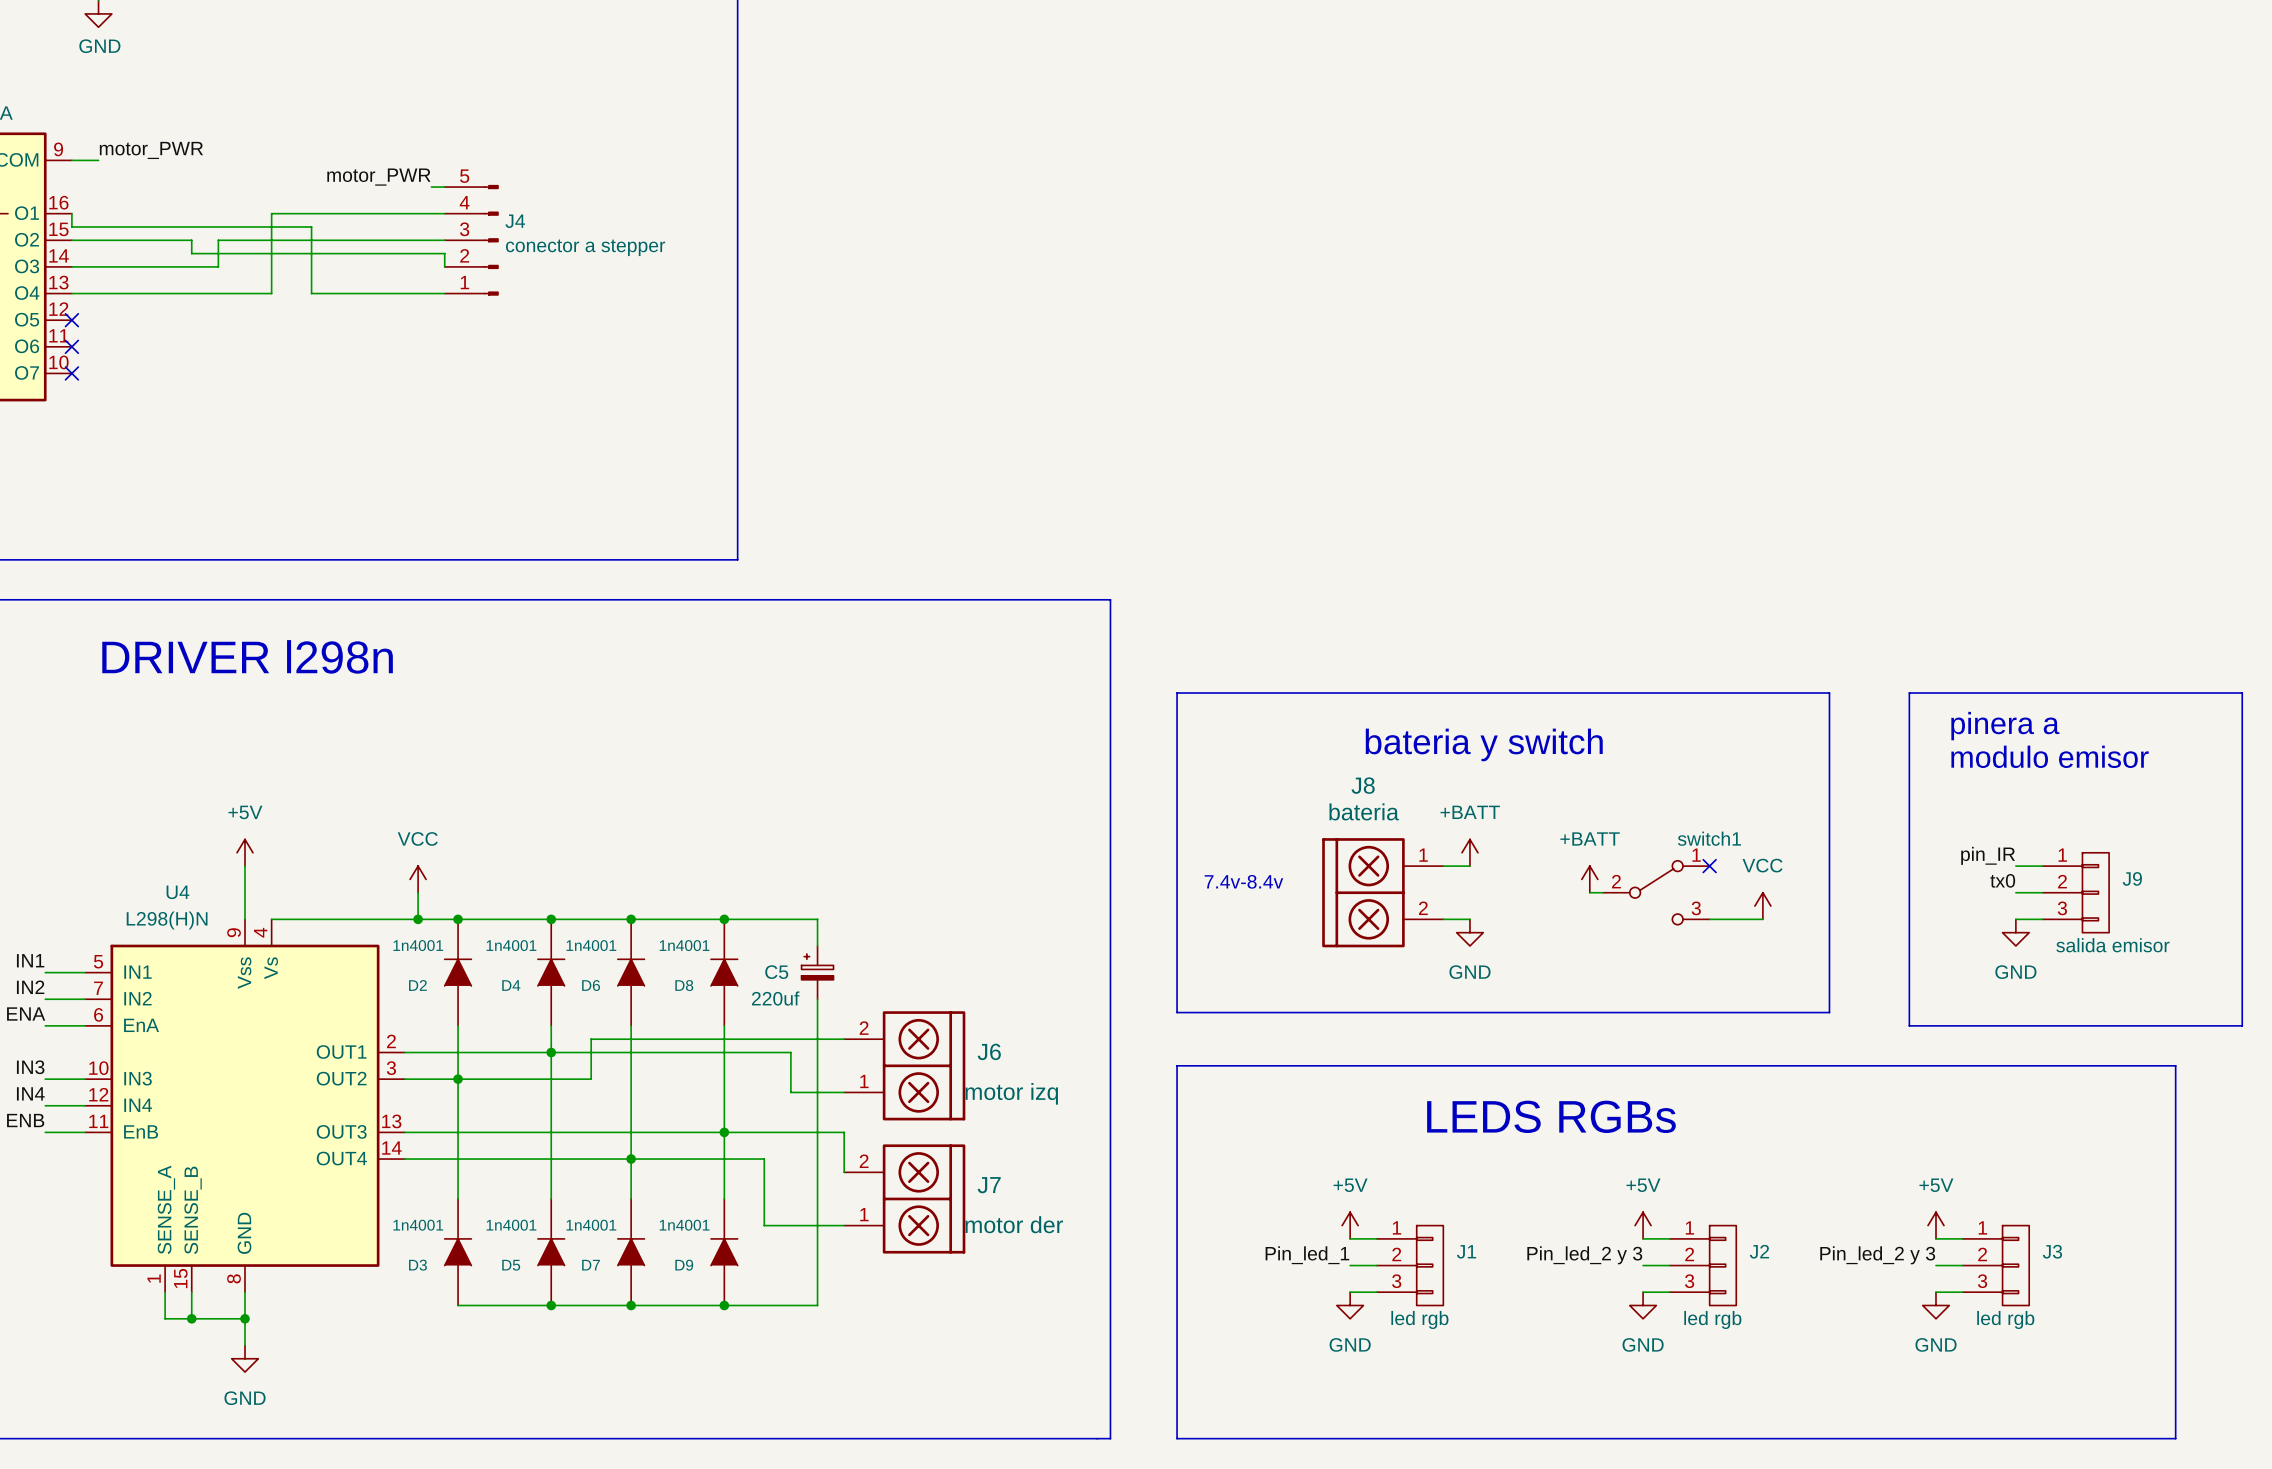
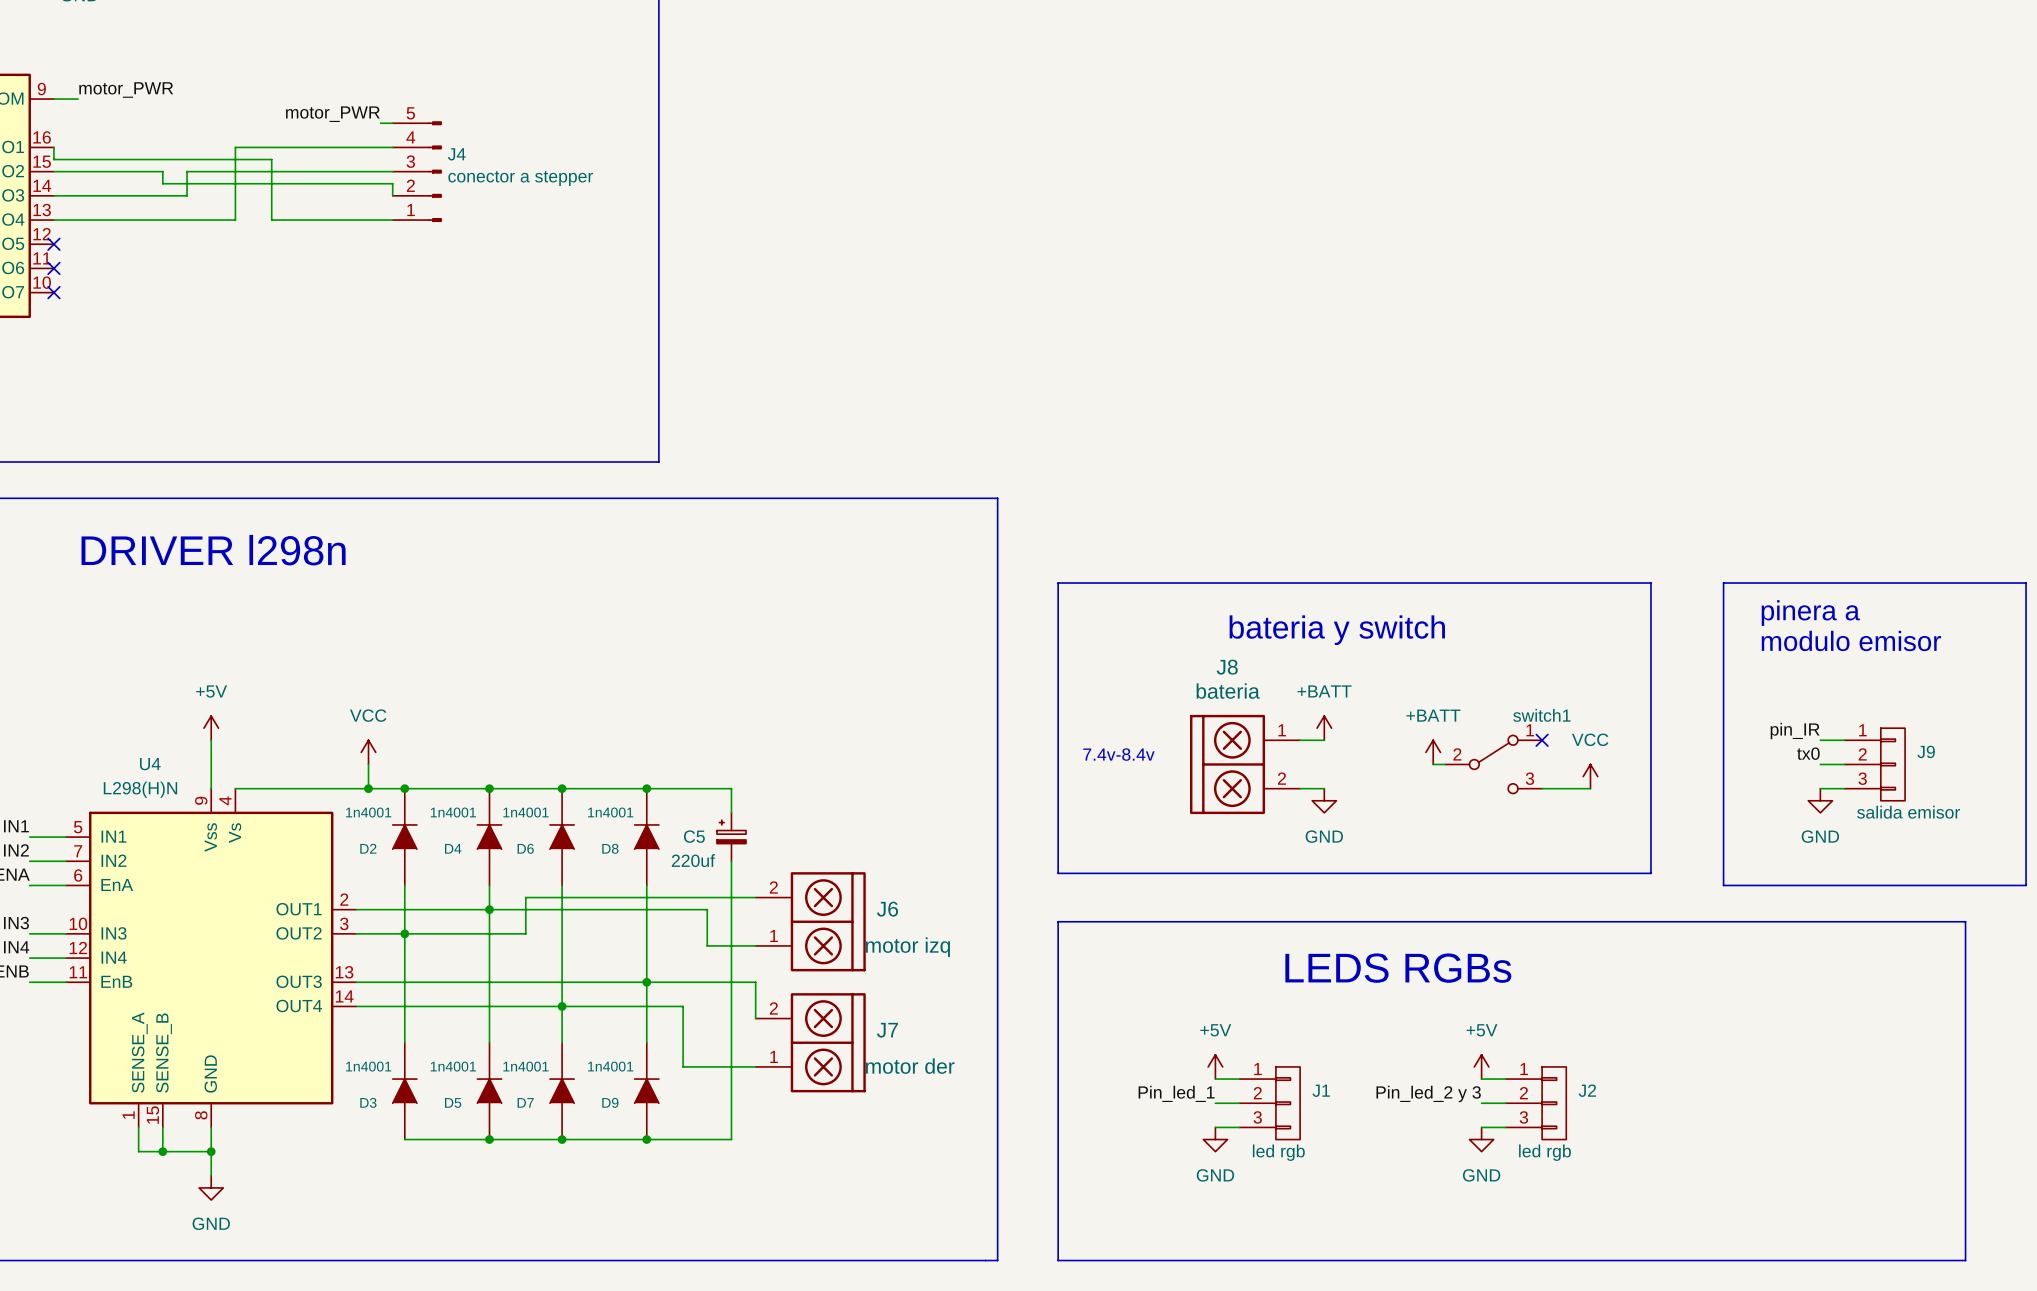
power symbol: +5V (1935, 1225) -> none
wire: (1935, 1238) (1962, 1238) -> none
label: Pin_led_2 y 3 (1877, 1255) -> none
wire: (1935, 1265) (1962, 1265) -> none
J3: led rgb (1995, 1265) -> none
wire: (1935, 1292) (1962, 1292) -> none
power symbol: GND (1935, 1305) -> none

